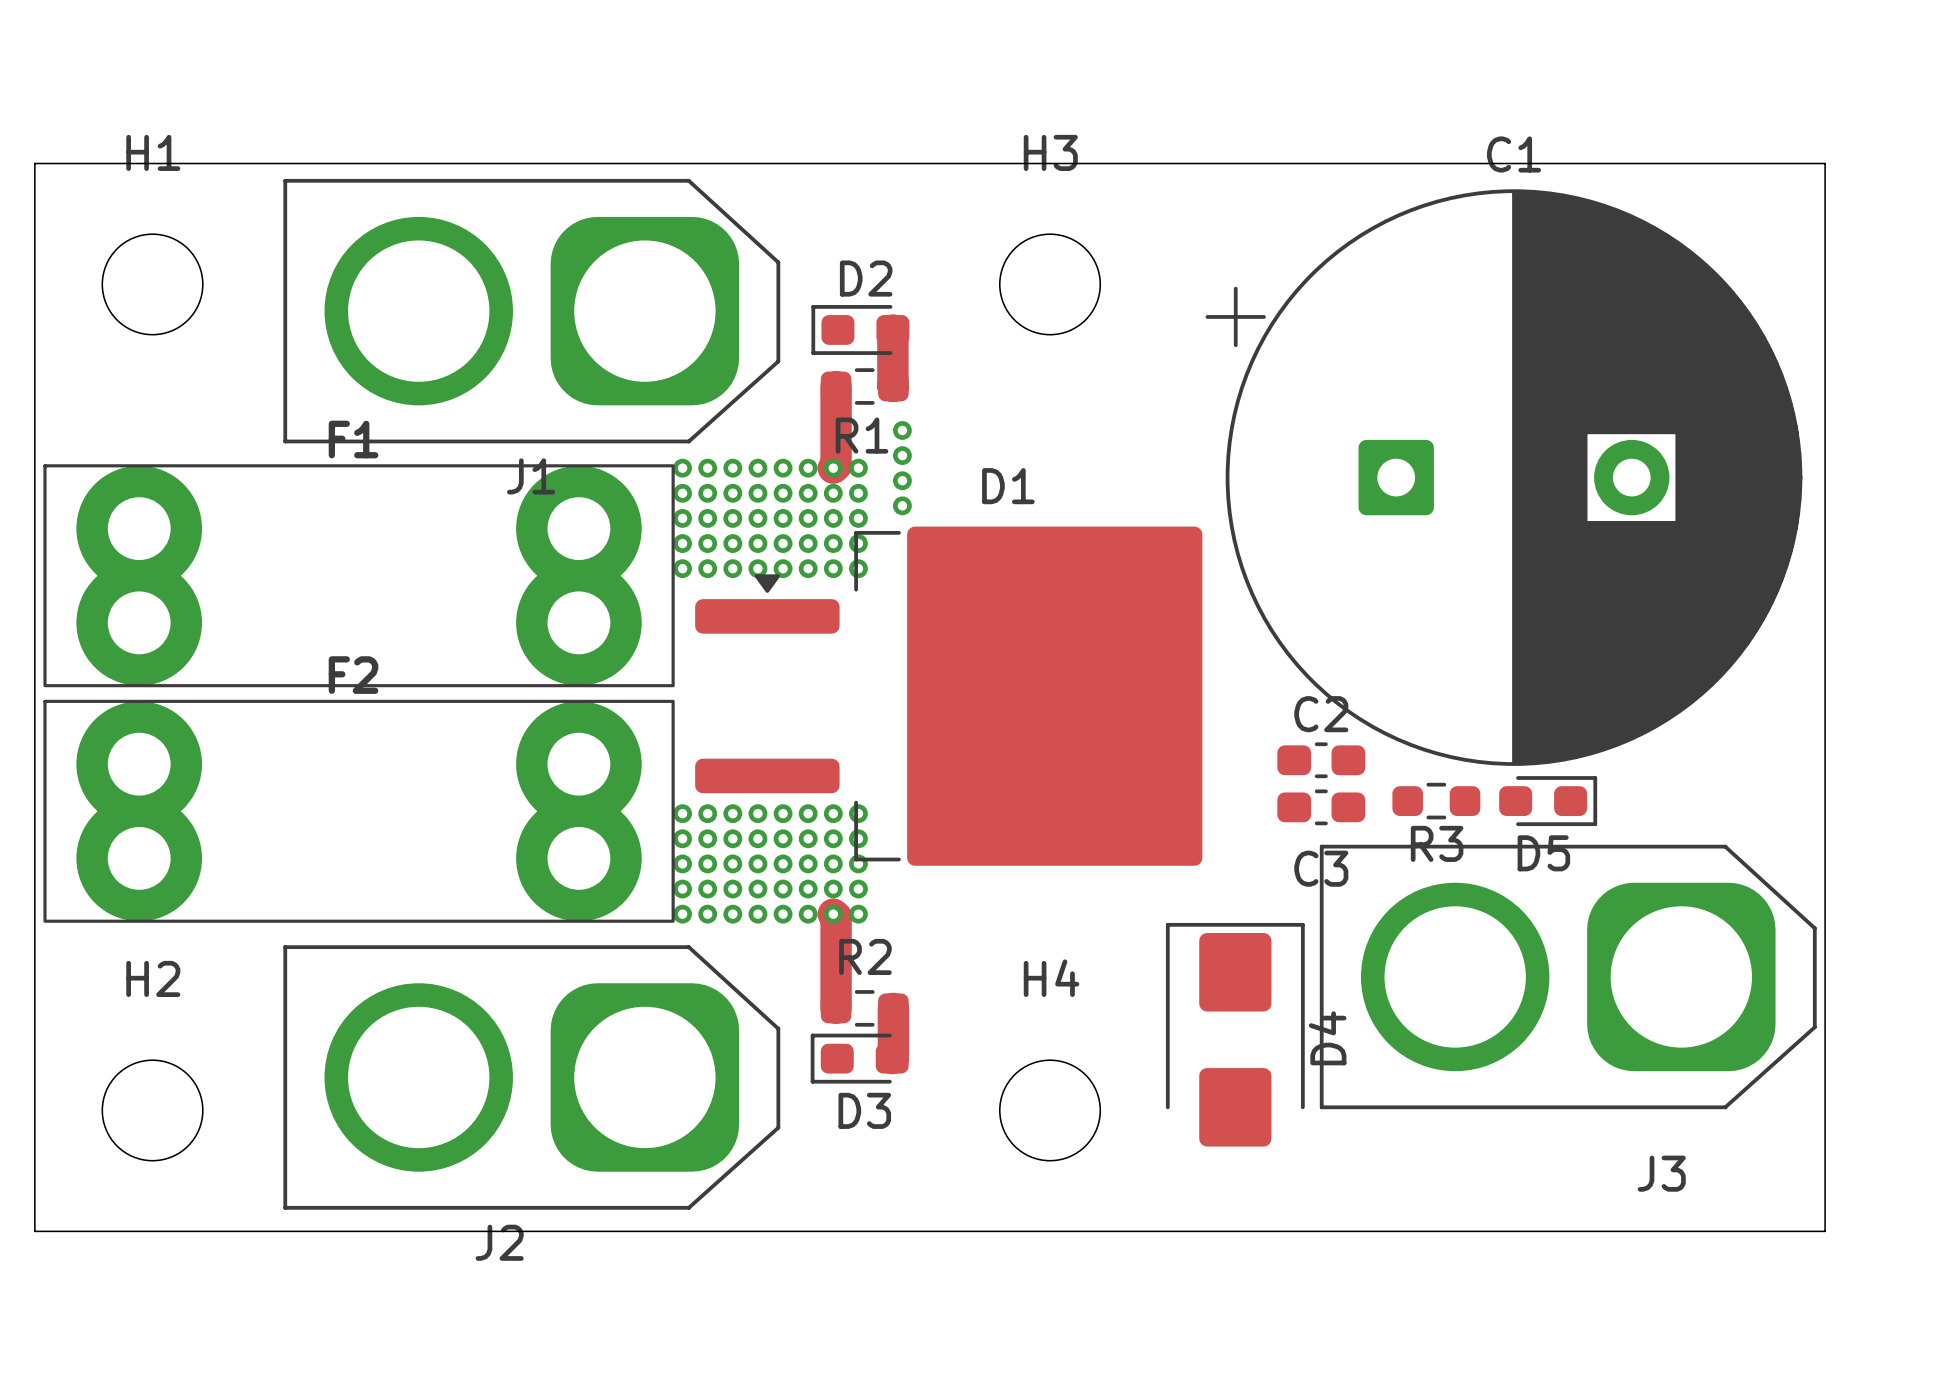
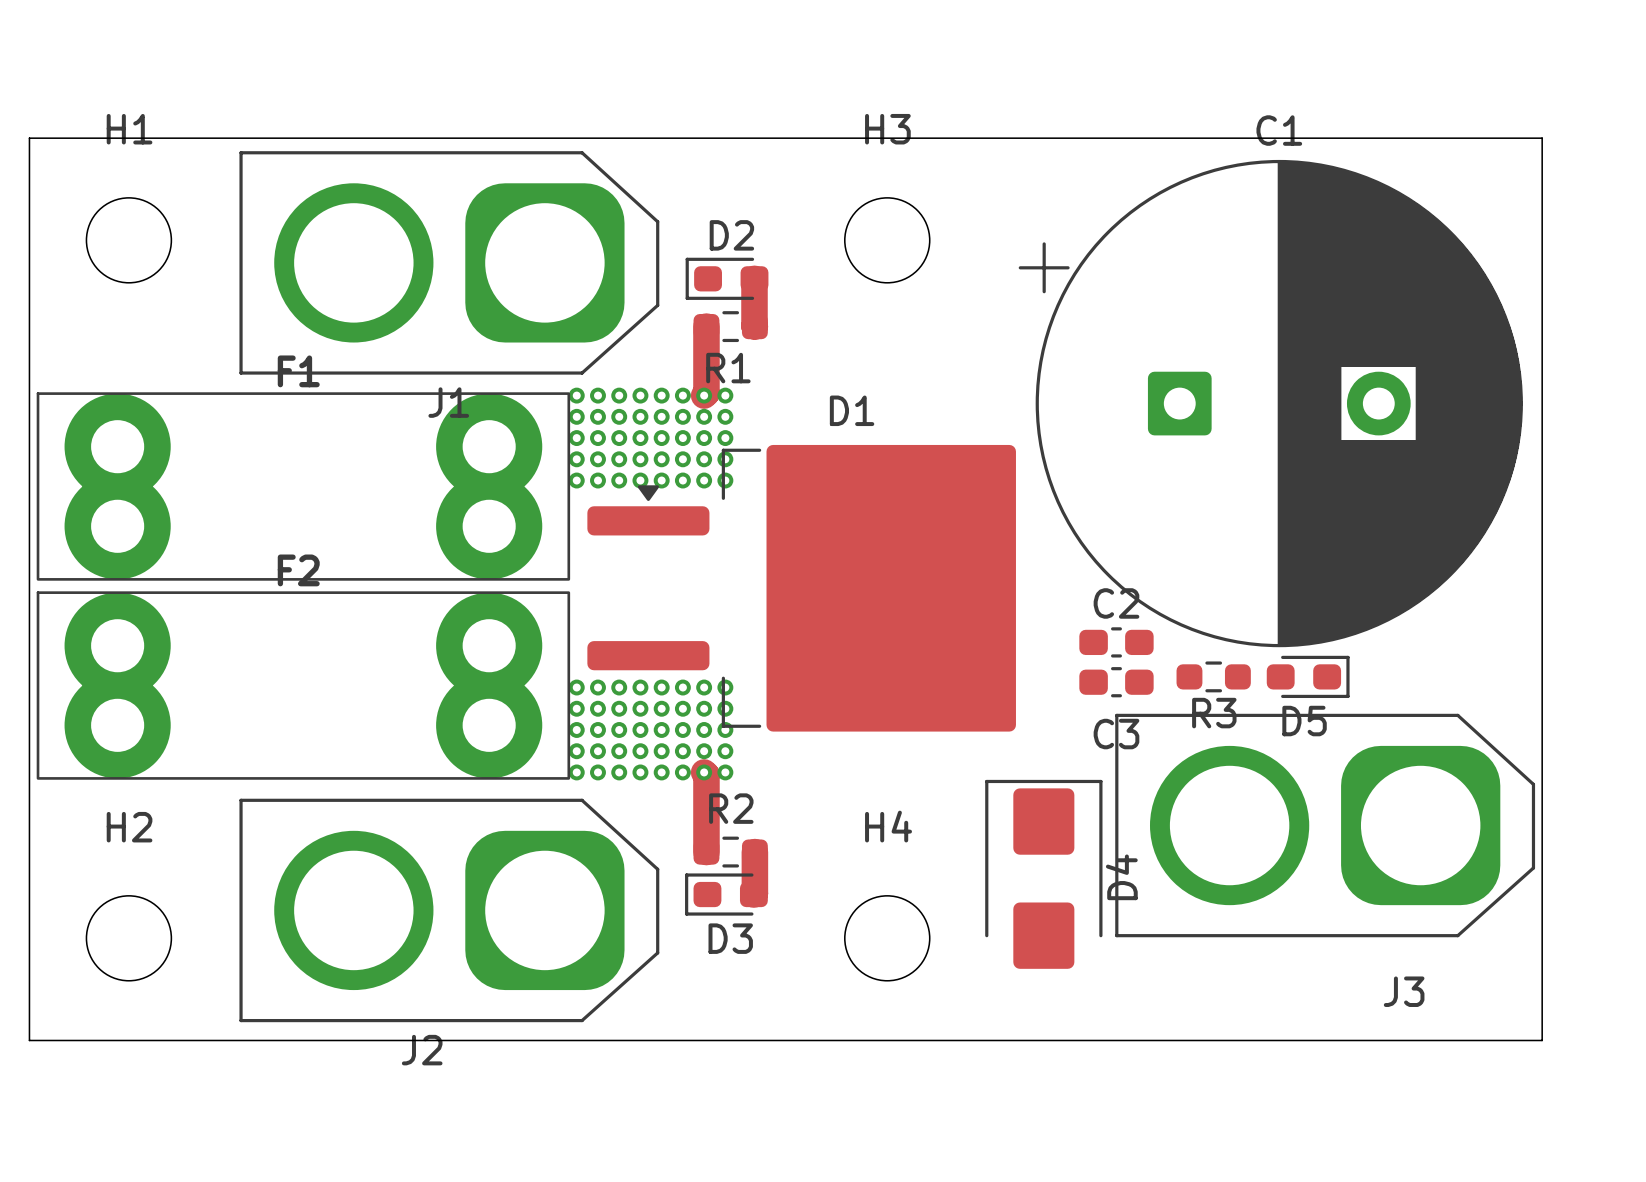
via: (902, 430) -> none
via: (902, 455) -> none
via: (902, 480) -> none
via: (902, 505) -> none

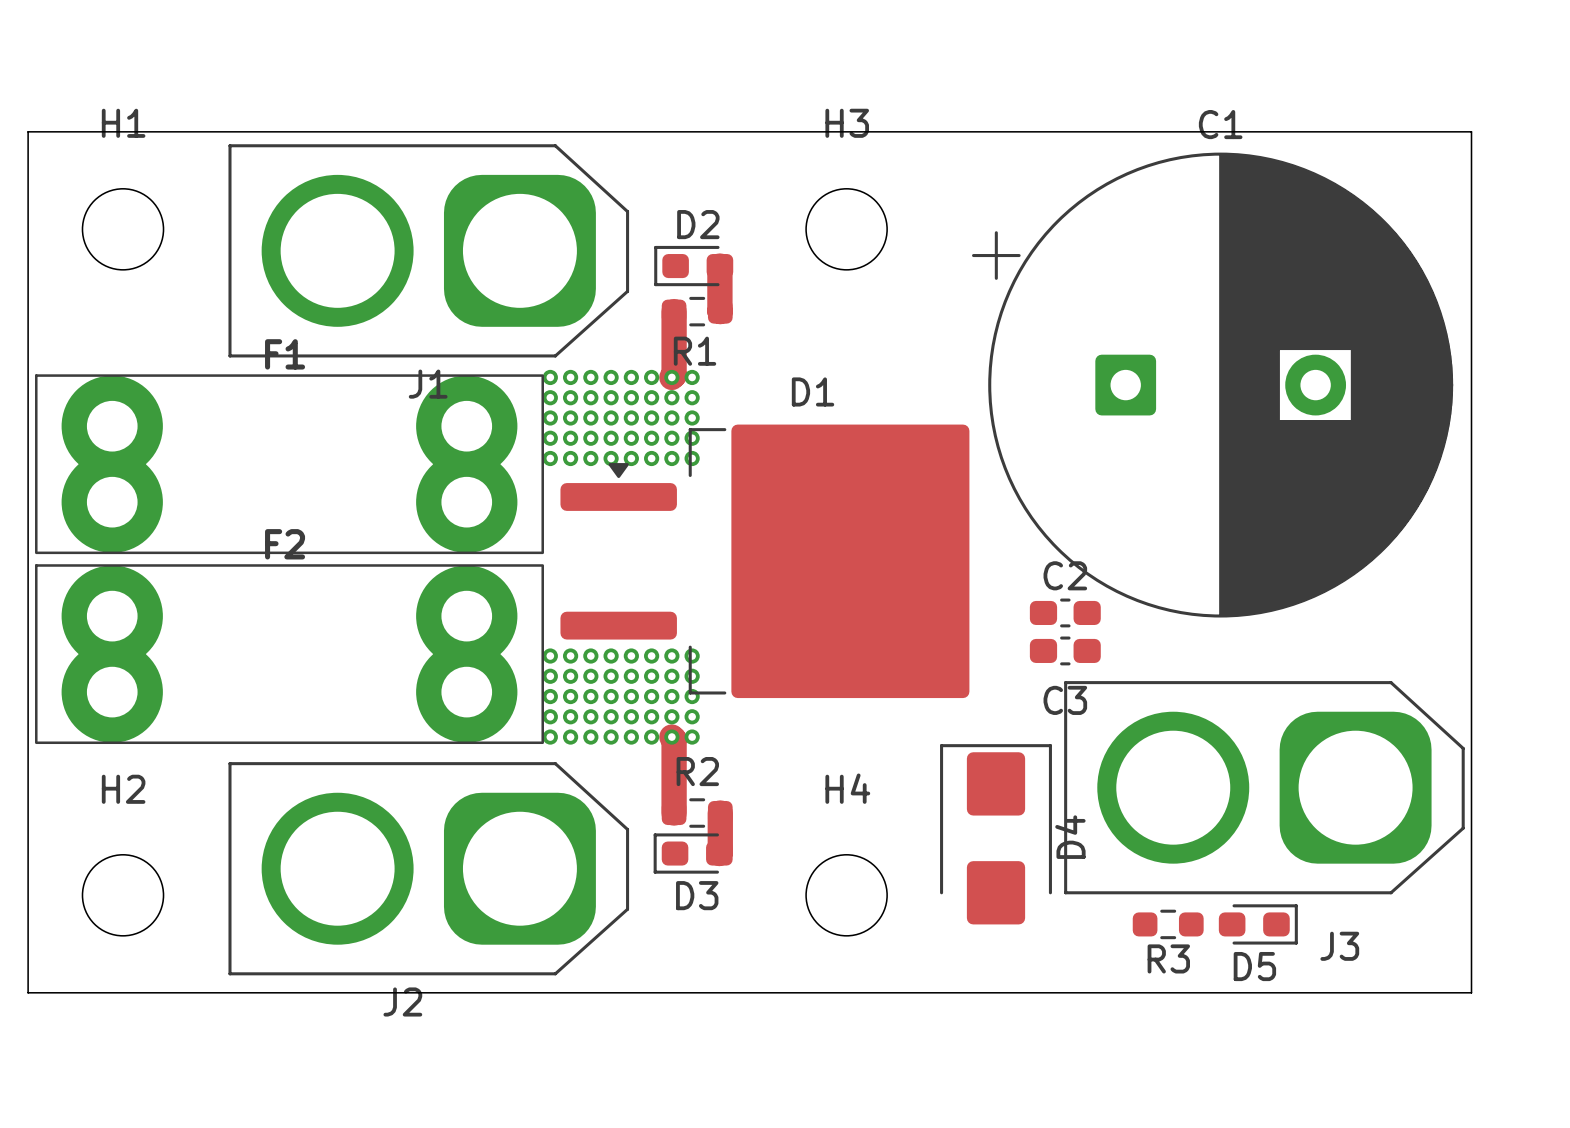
R3 position: (1213, 676) -> (1168, 924)
D5 position: (1308, 676) -> (1258, 924)

